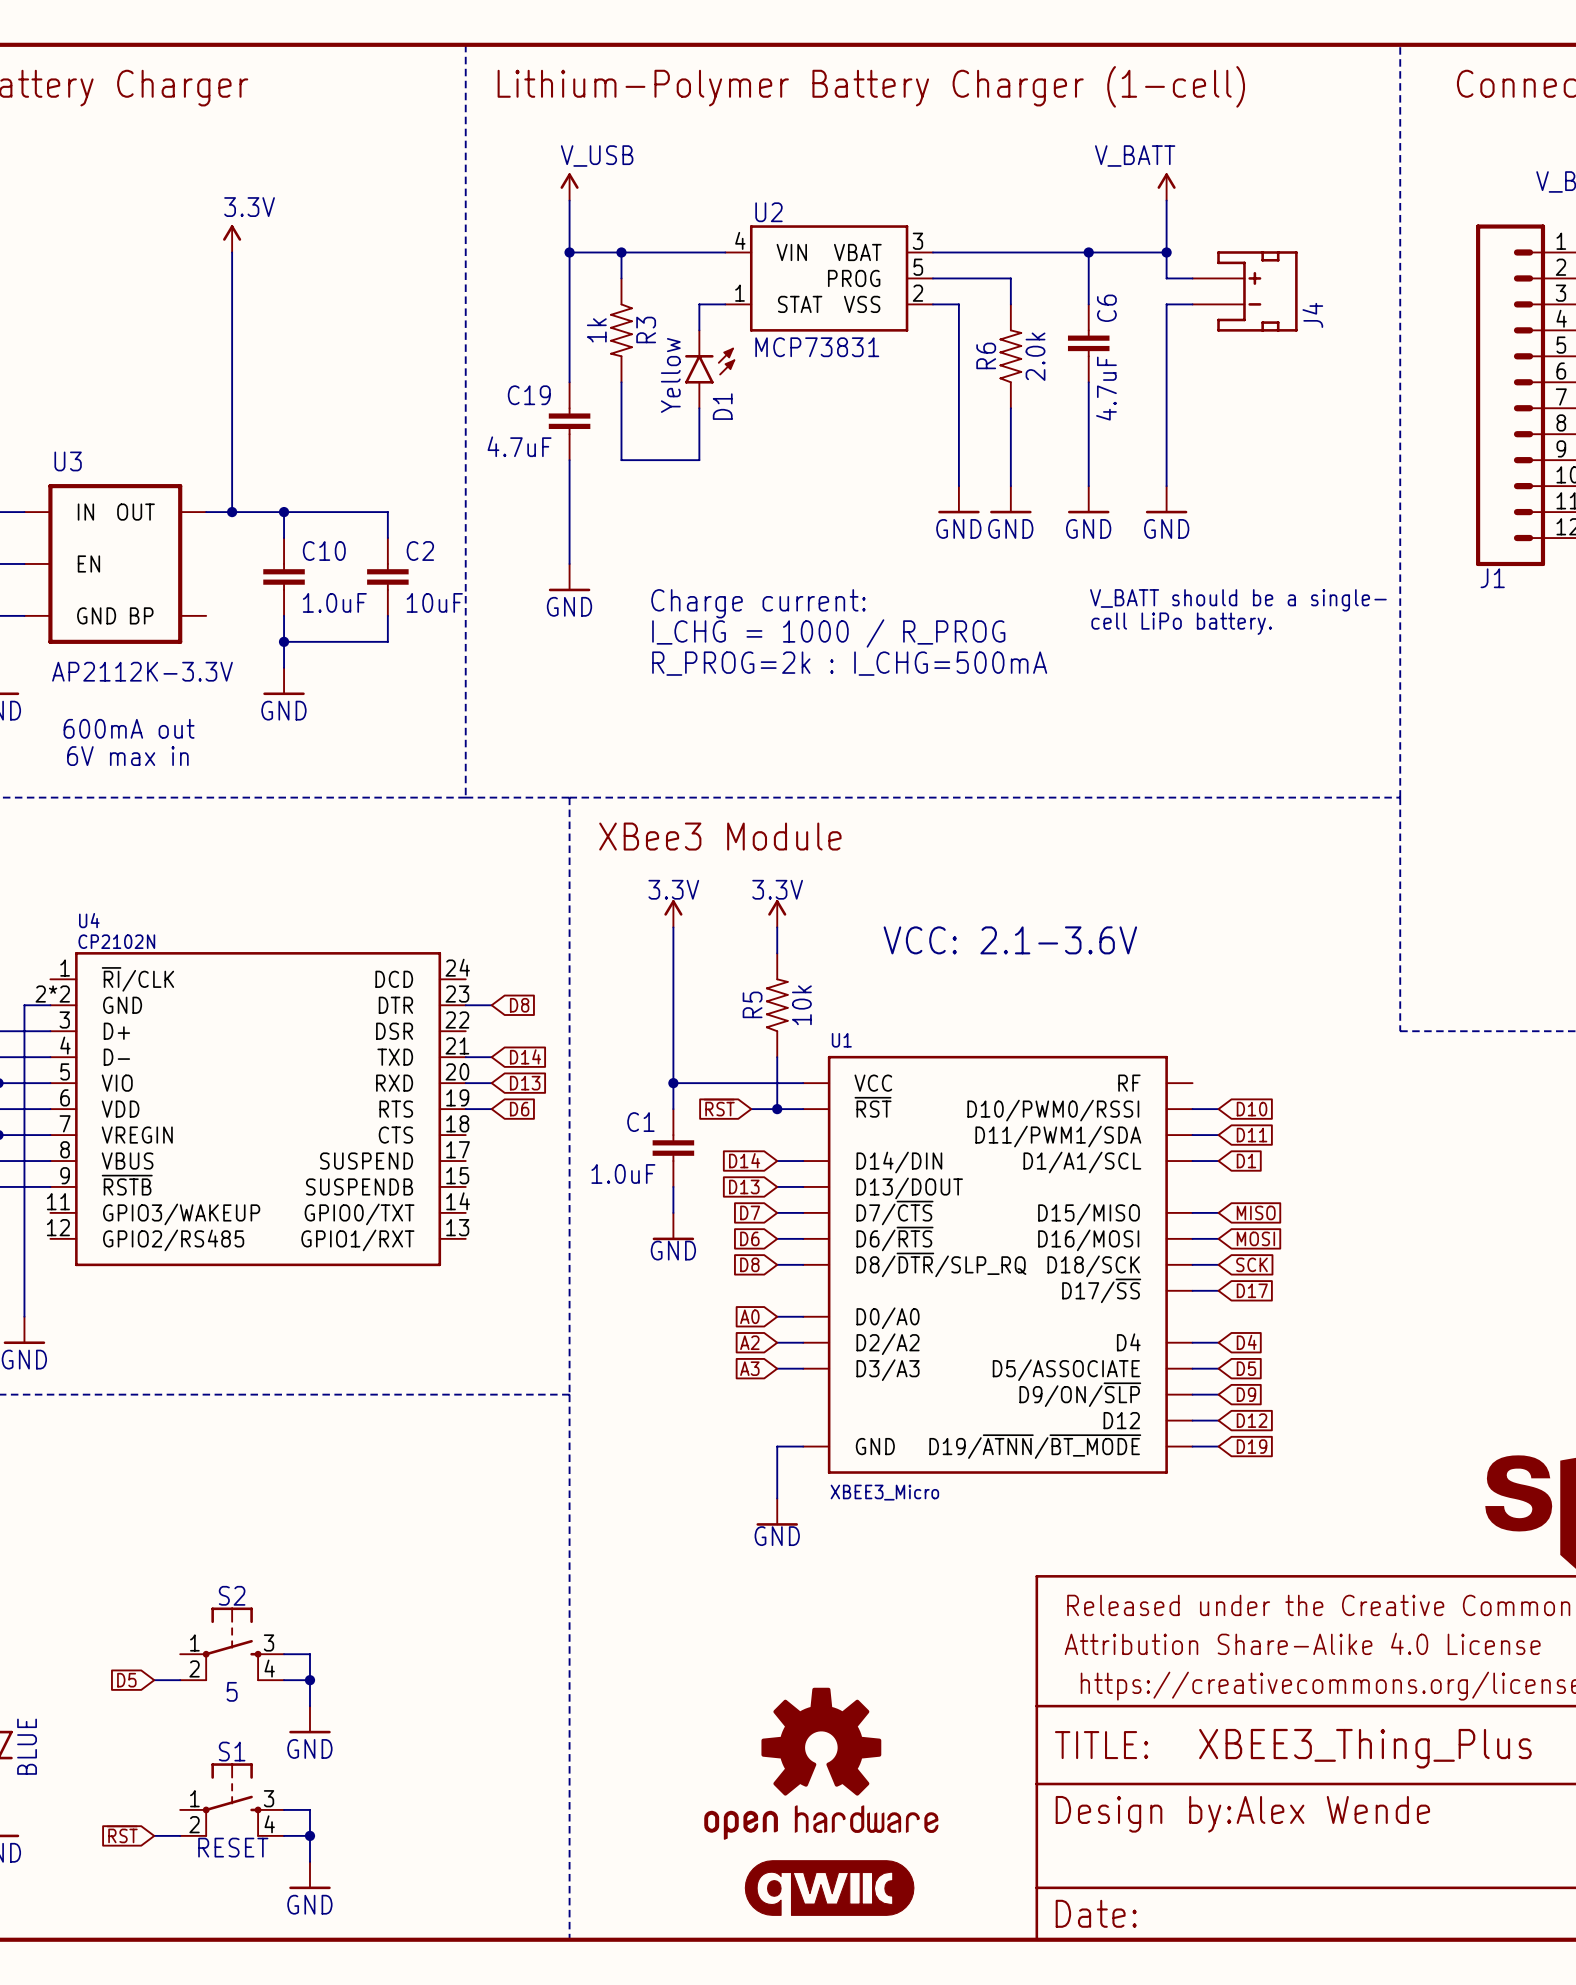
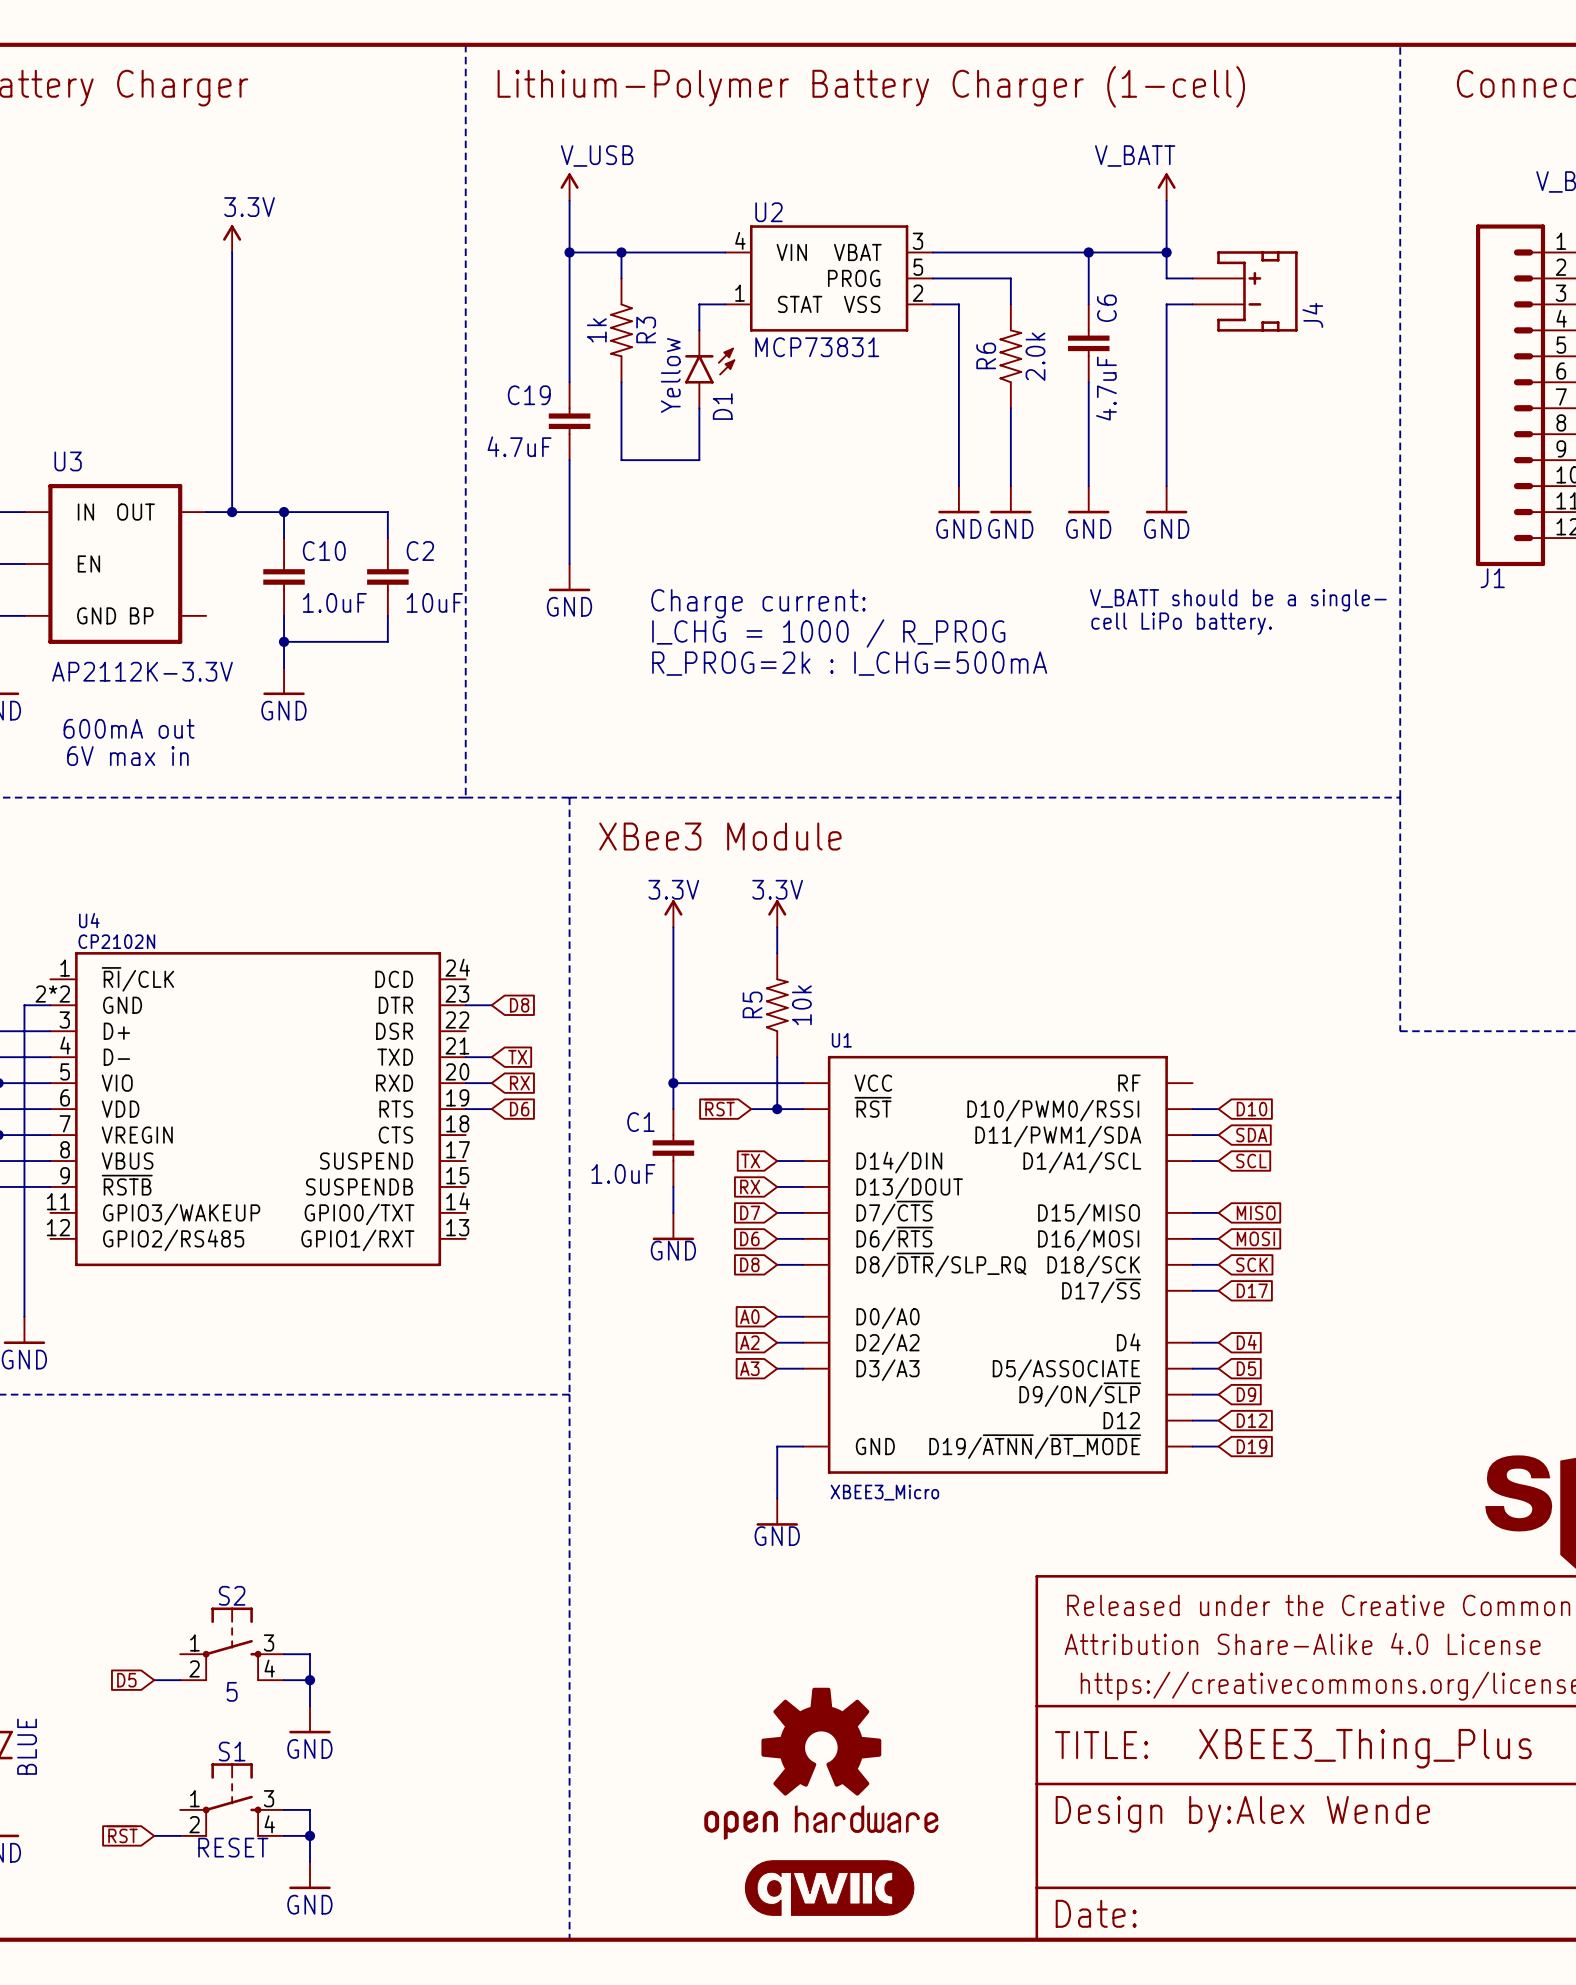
text: VCC: 2.1-3.6V (1010, 940) -> none
global label: D14 (525, 1056) -> TX (517, 1057)
global label: D13 (525, 1083) -> RX (519, 1083)
global label: D11 (1252, 1135) -> SDA (1251, 1135)
global label: D14 (744, 1160) -> TX (750, 1161)
global label: D1 (1246, 1161) -> SCL (1251, 1161)
global label: D13 (744, 1186) -> RX (750, 1186)

